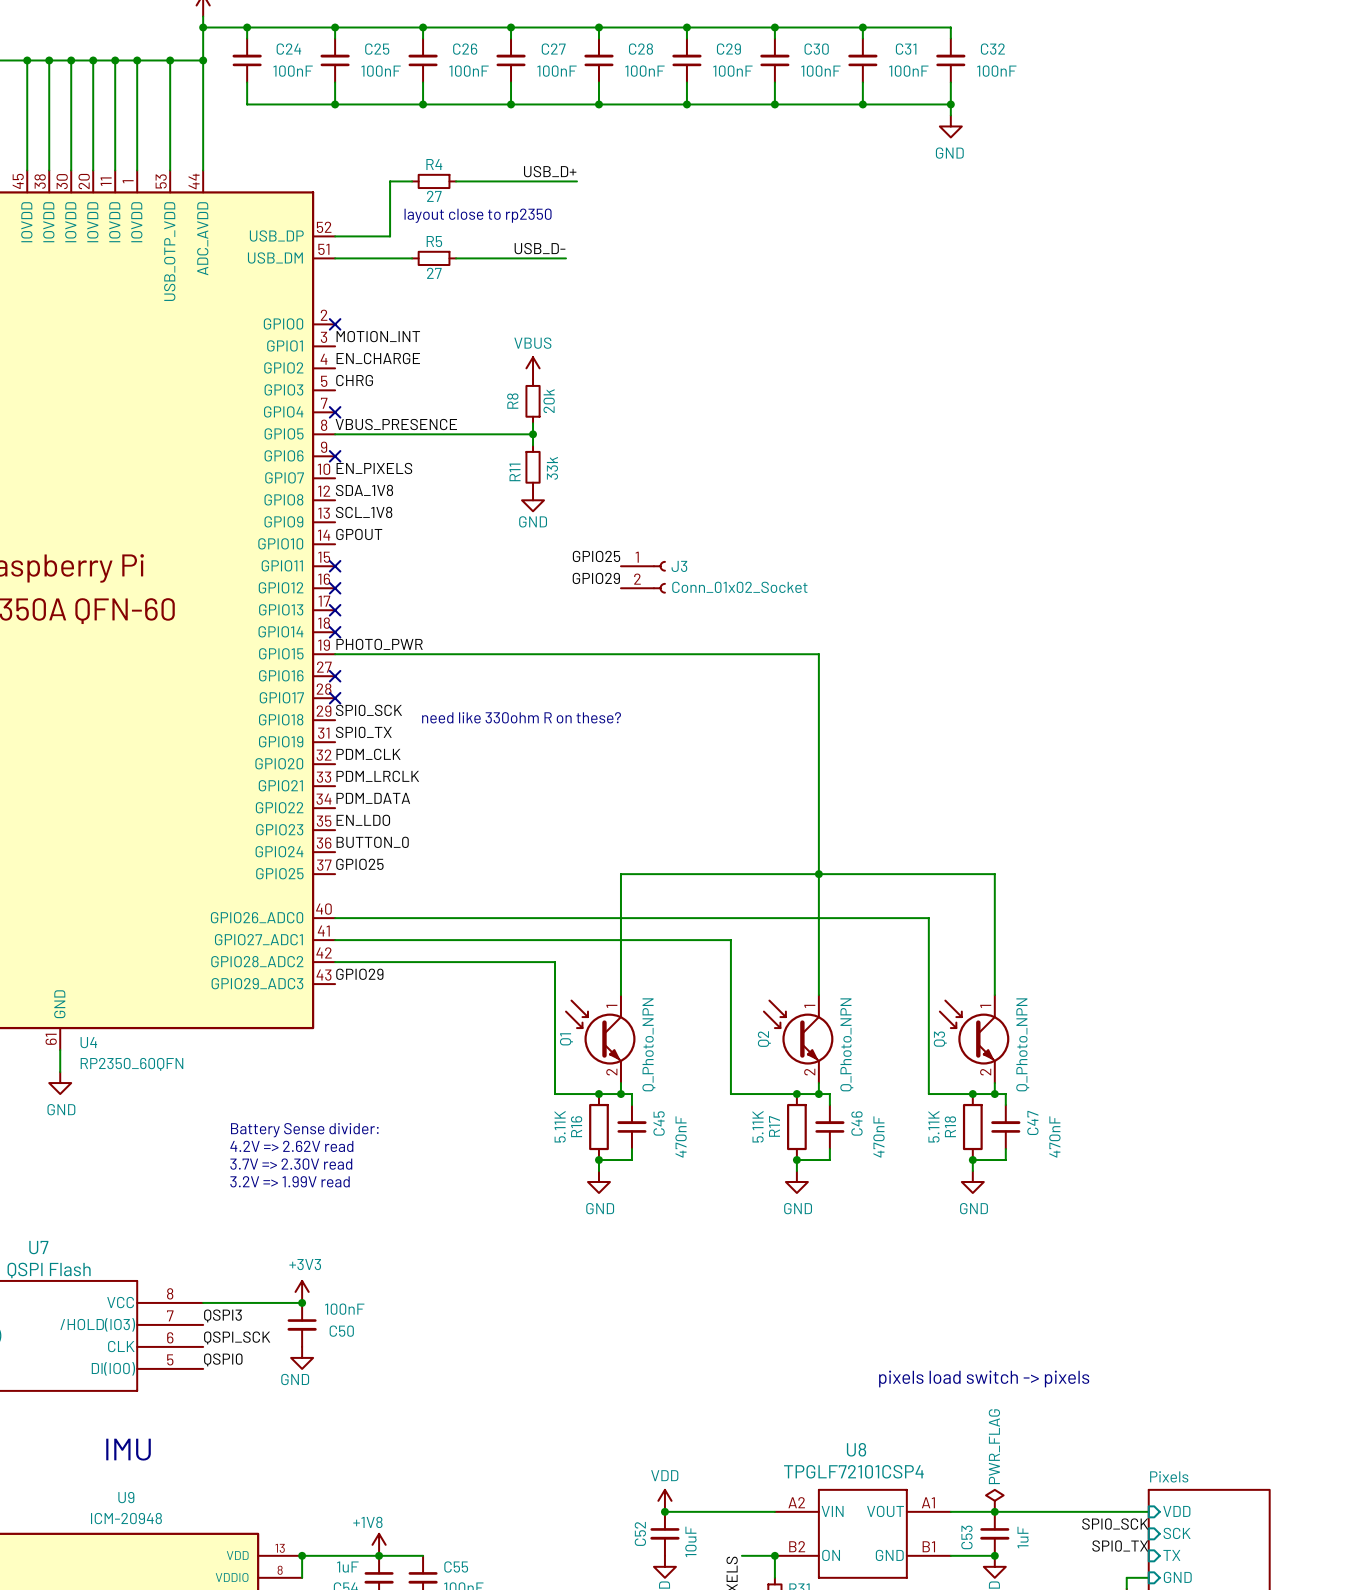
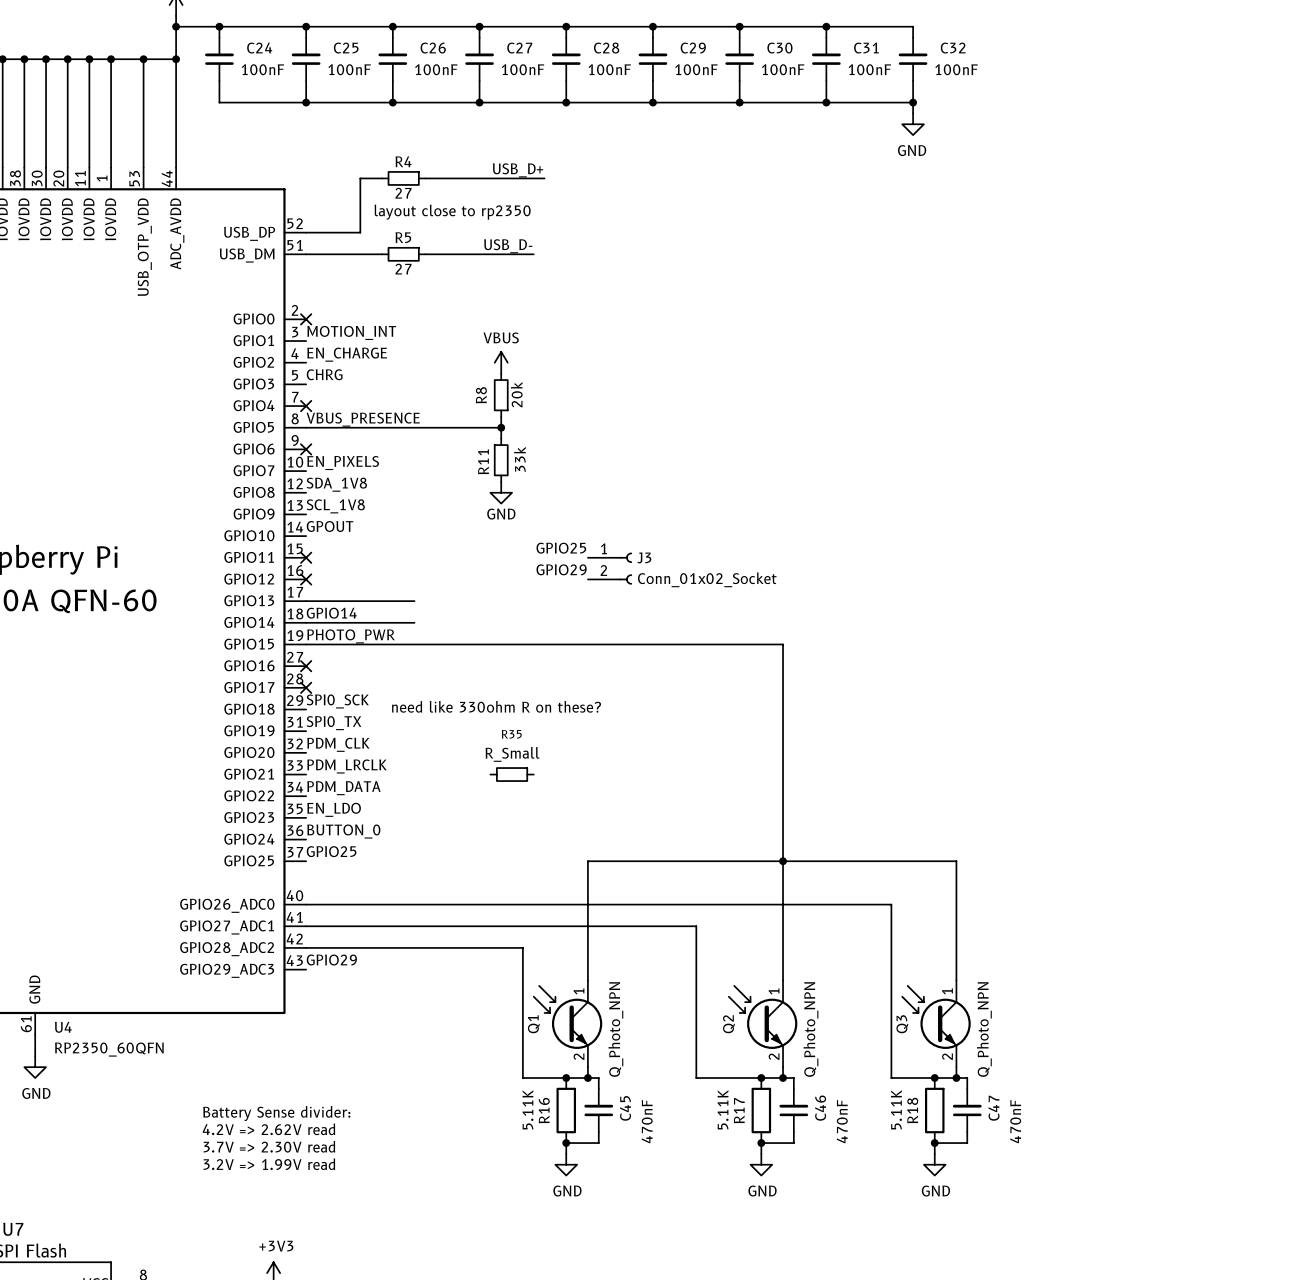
wire: none -> (306, 601) (414, 601)
no-connect mark: (335, 610) -> none
label: none -> GPIO14 (331, 613)
wire: none -> (306, 622) (414, 622)
no-connect mark: (335, 632) -> none
R35: none -> R_Small (512, 774)

